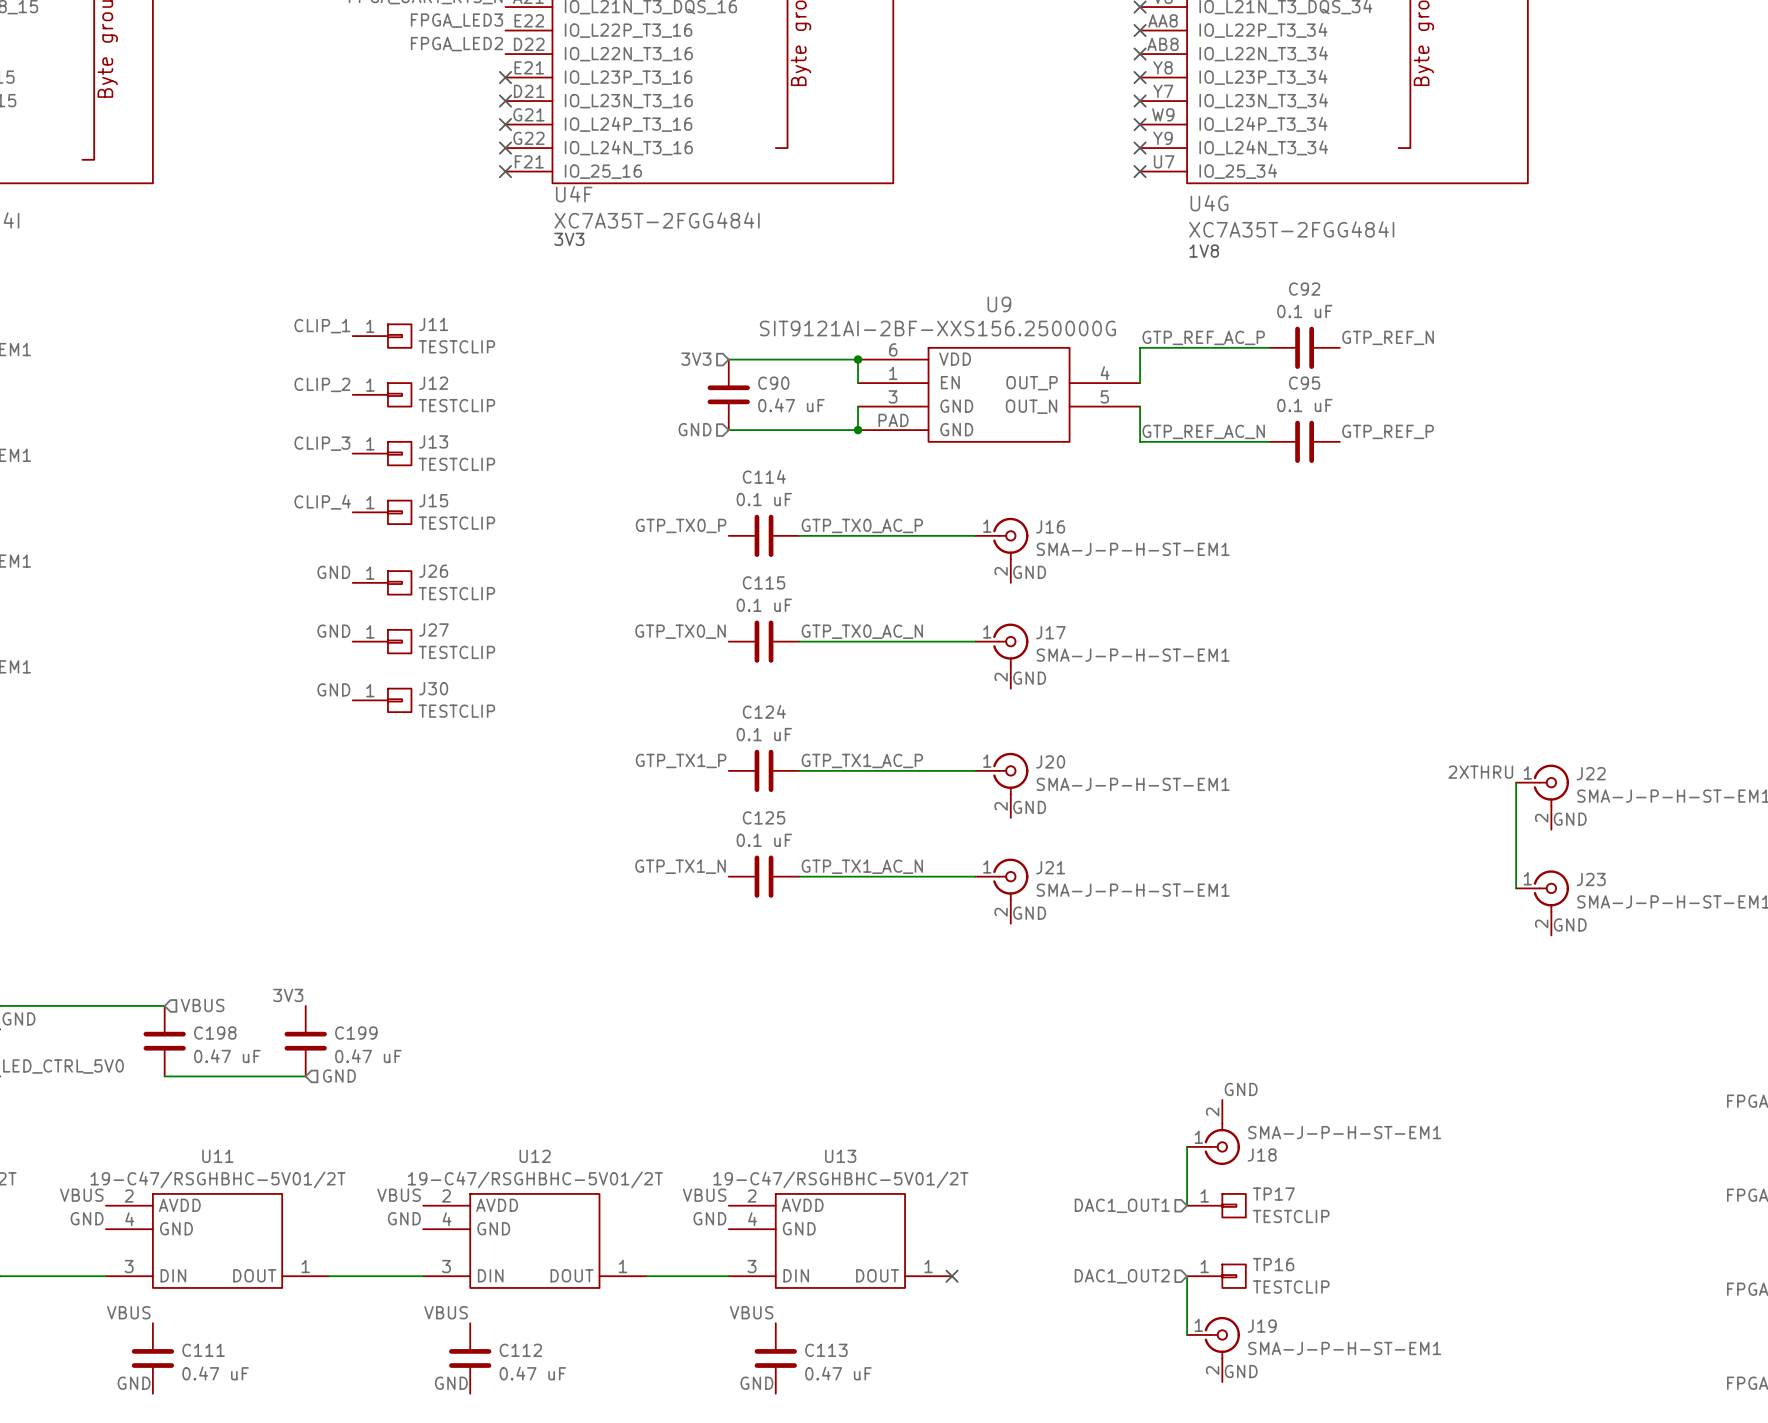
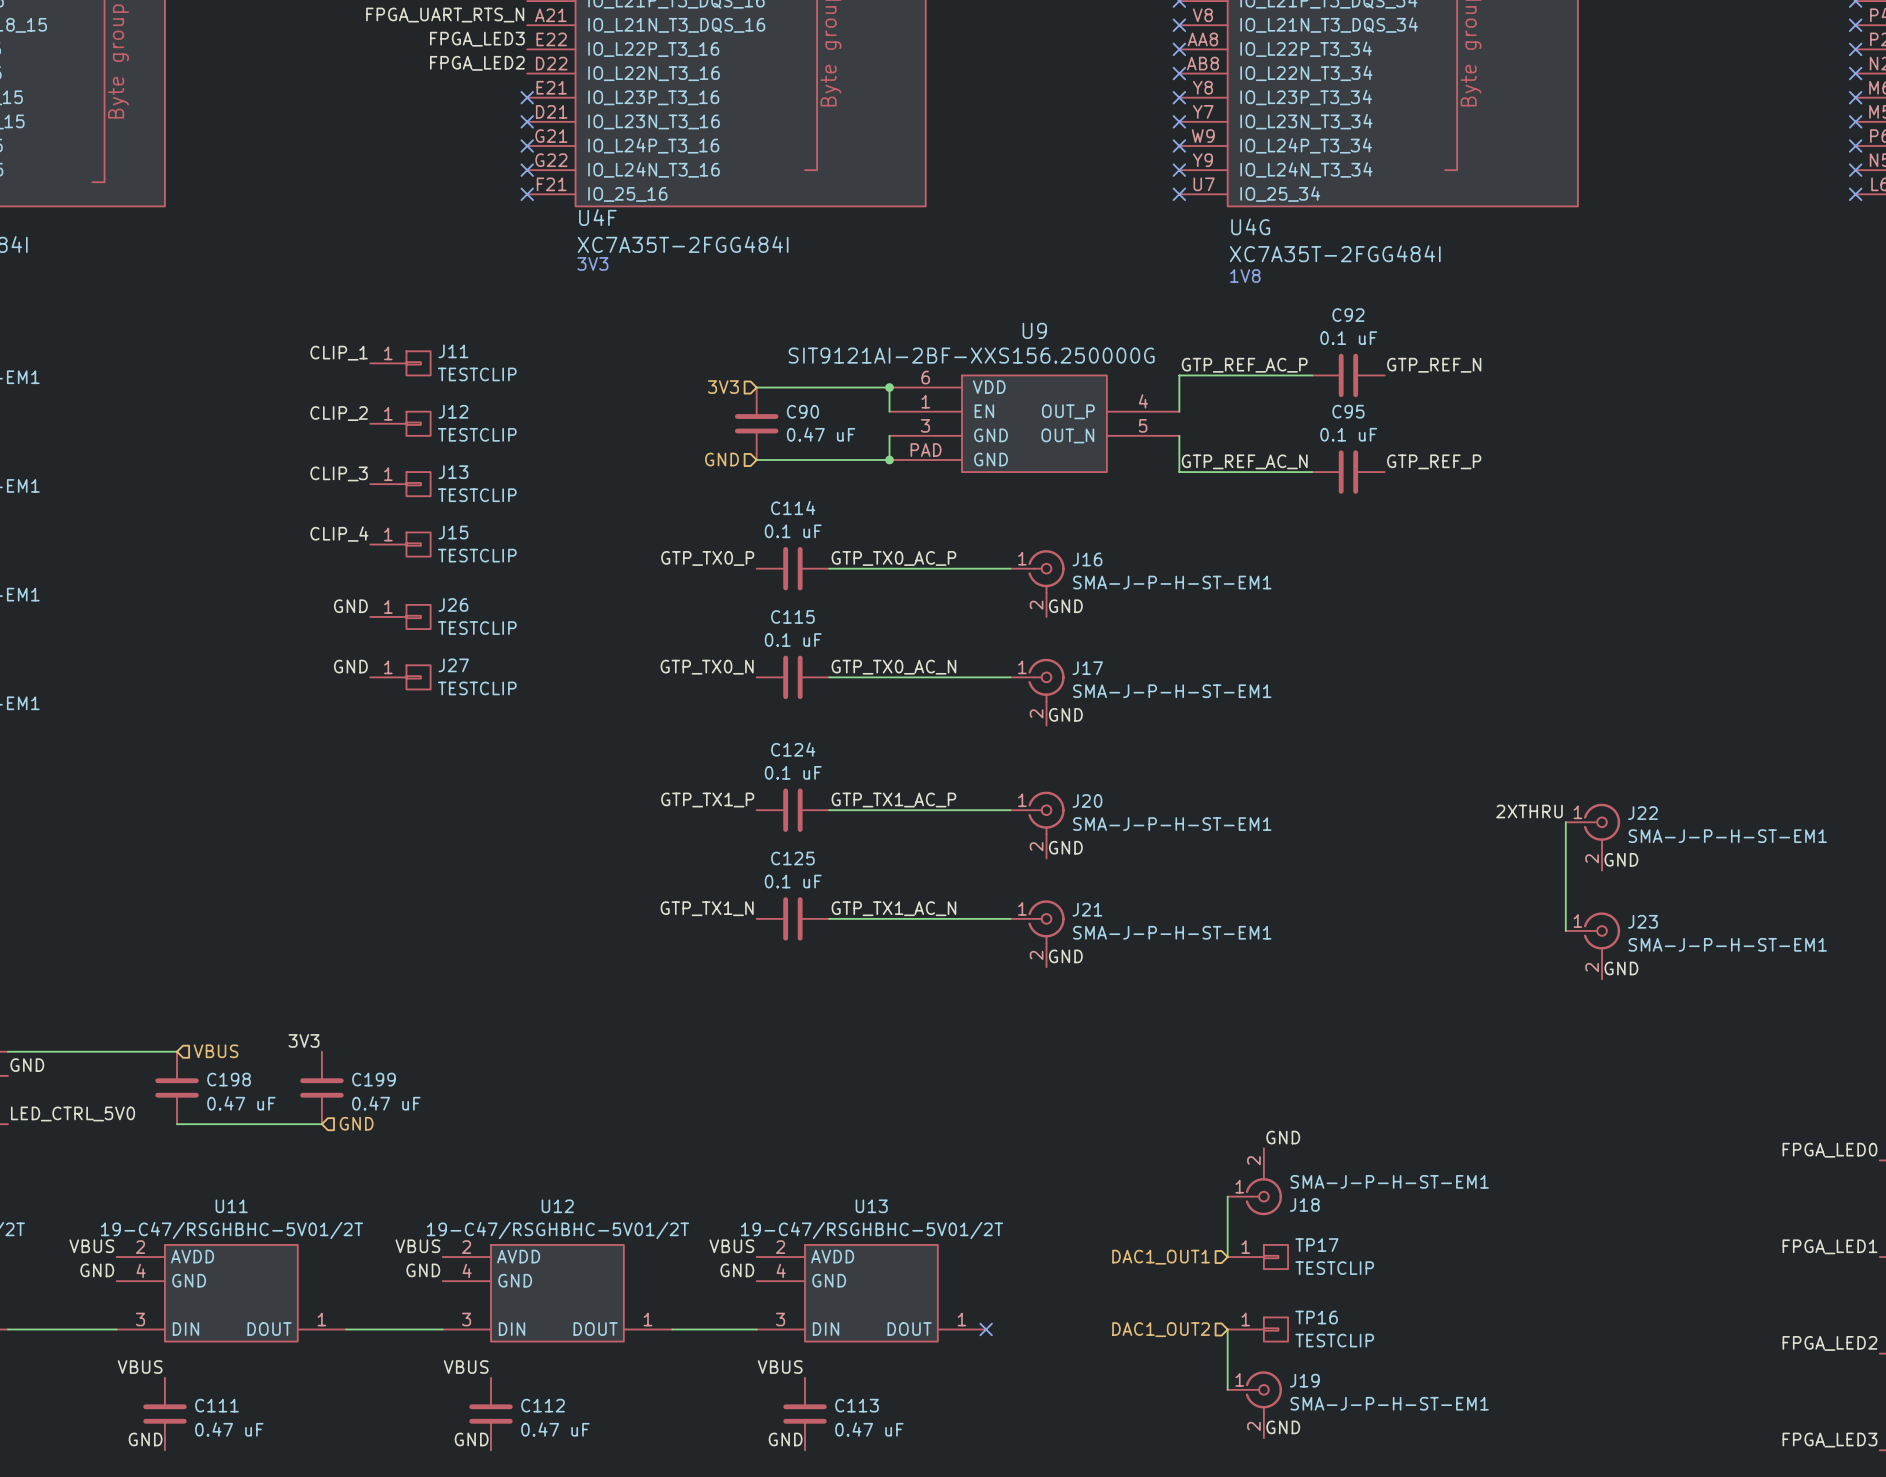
label: GND (333, 689) -> none
J30: TESTCLIP (382, 700) -> none

